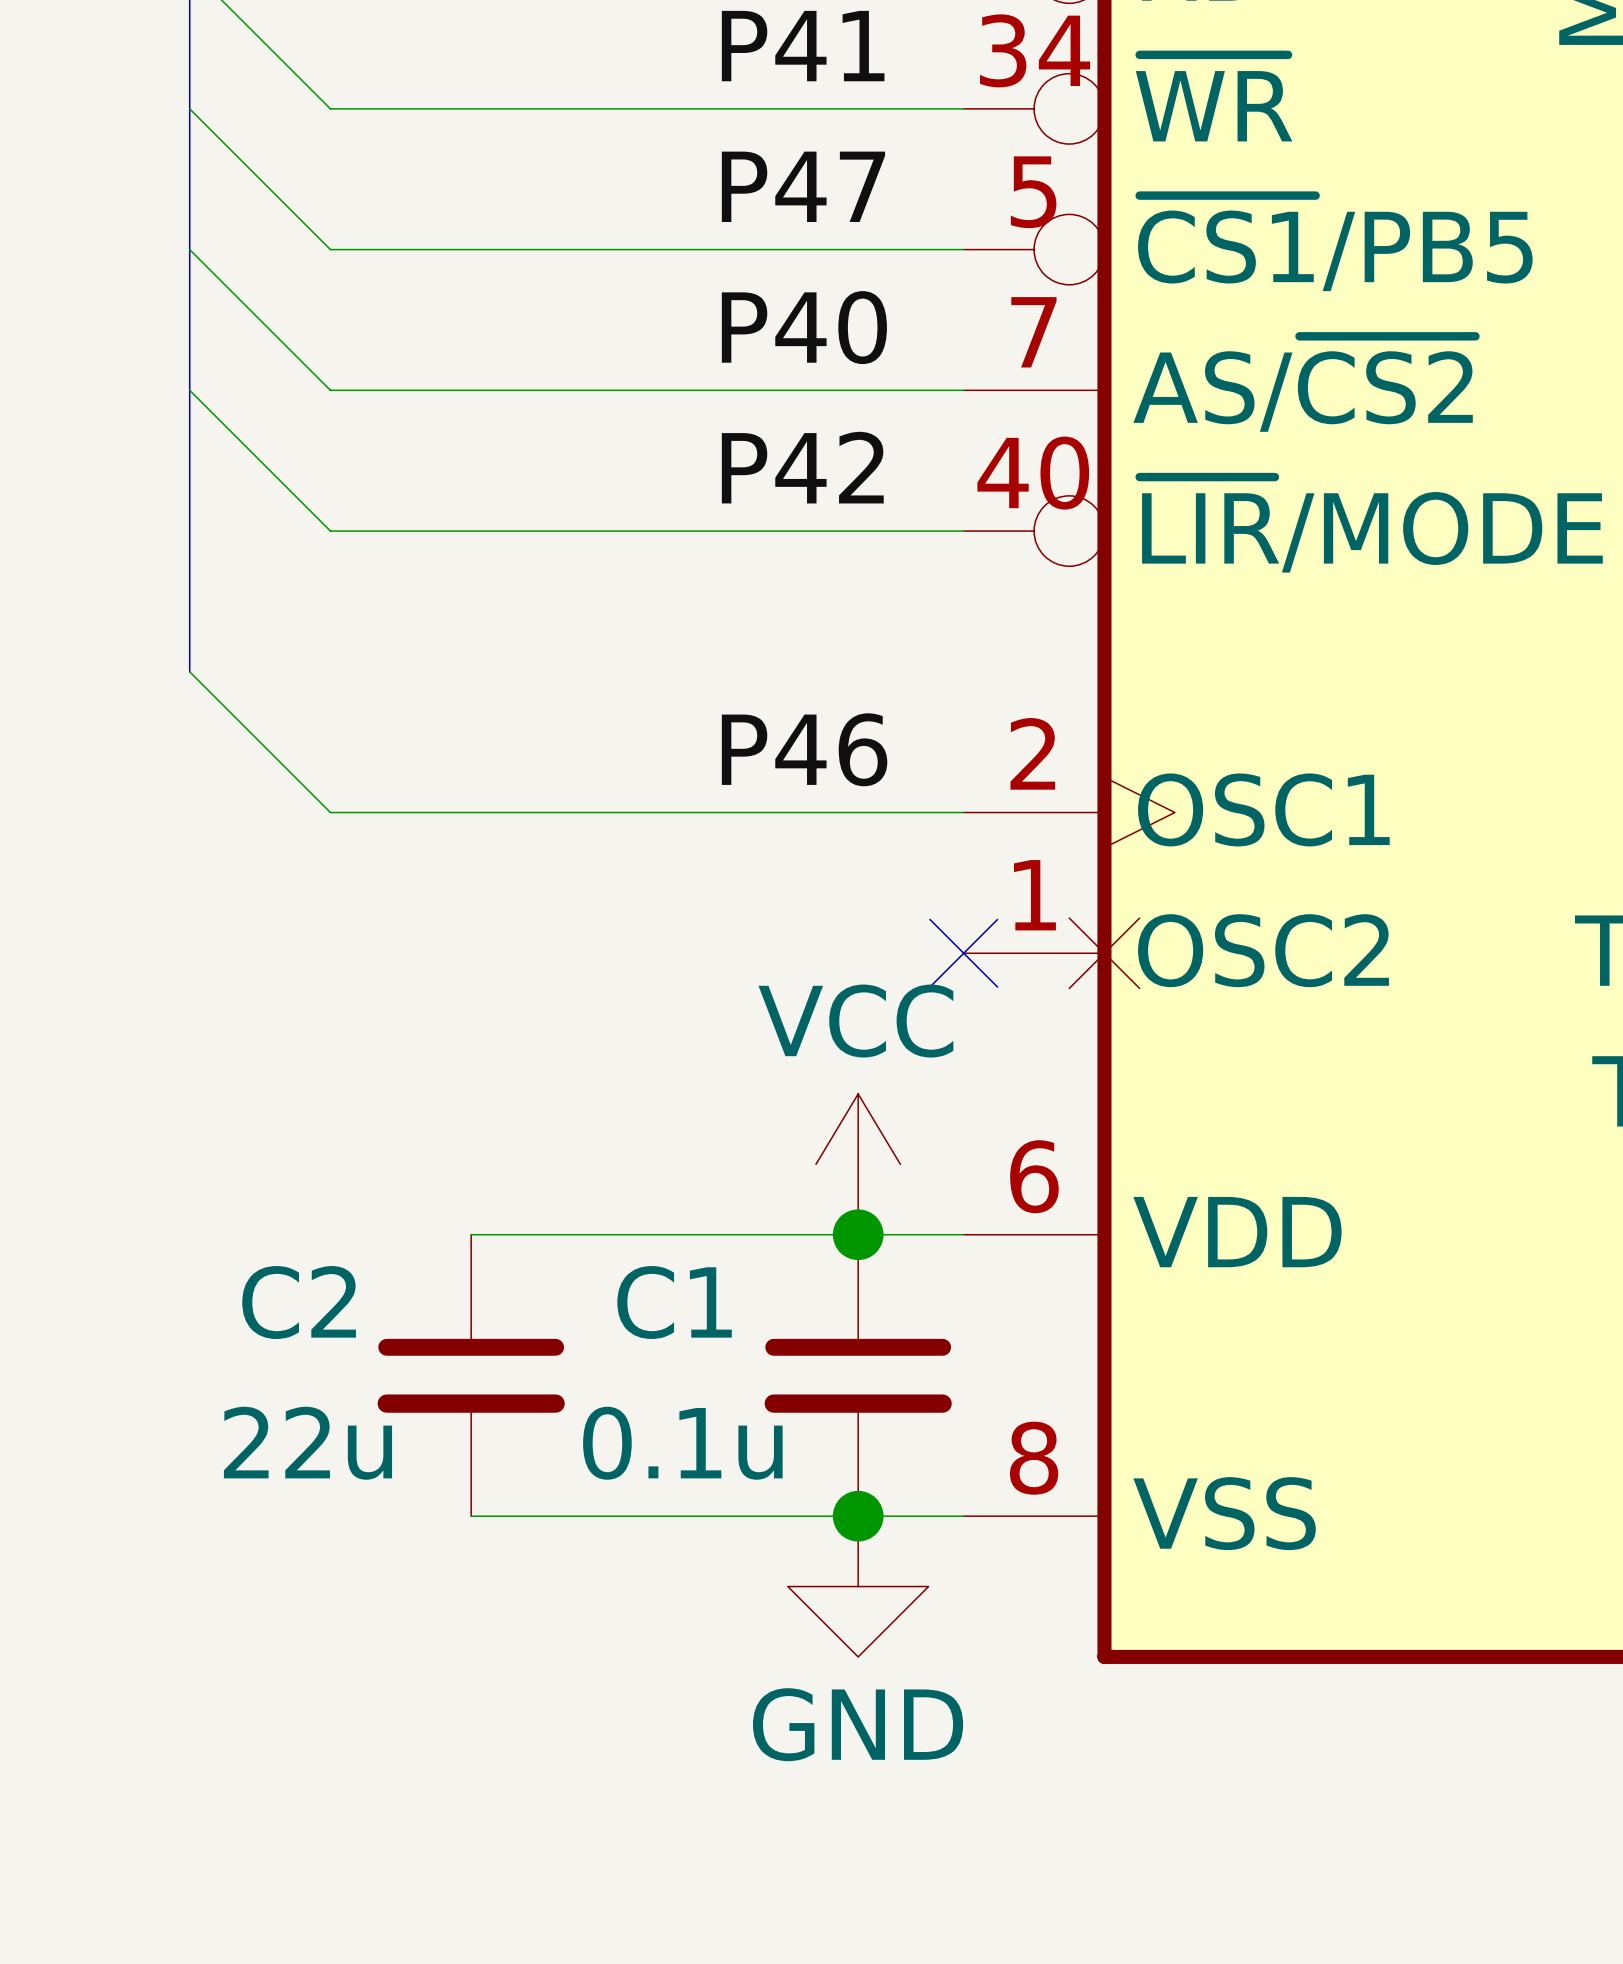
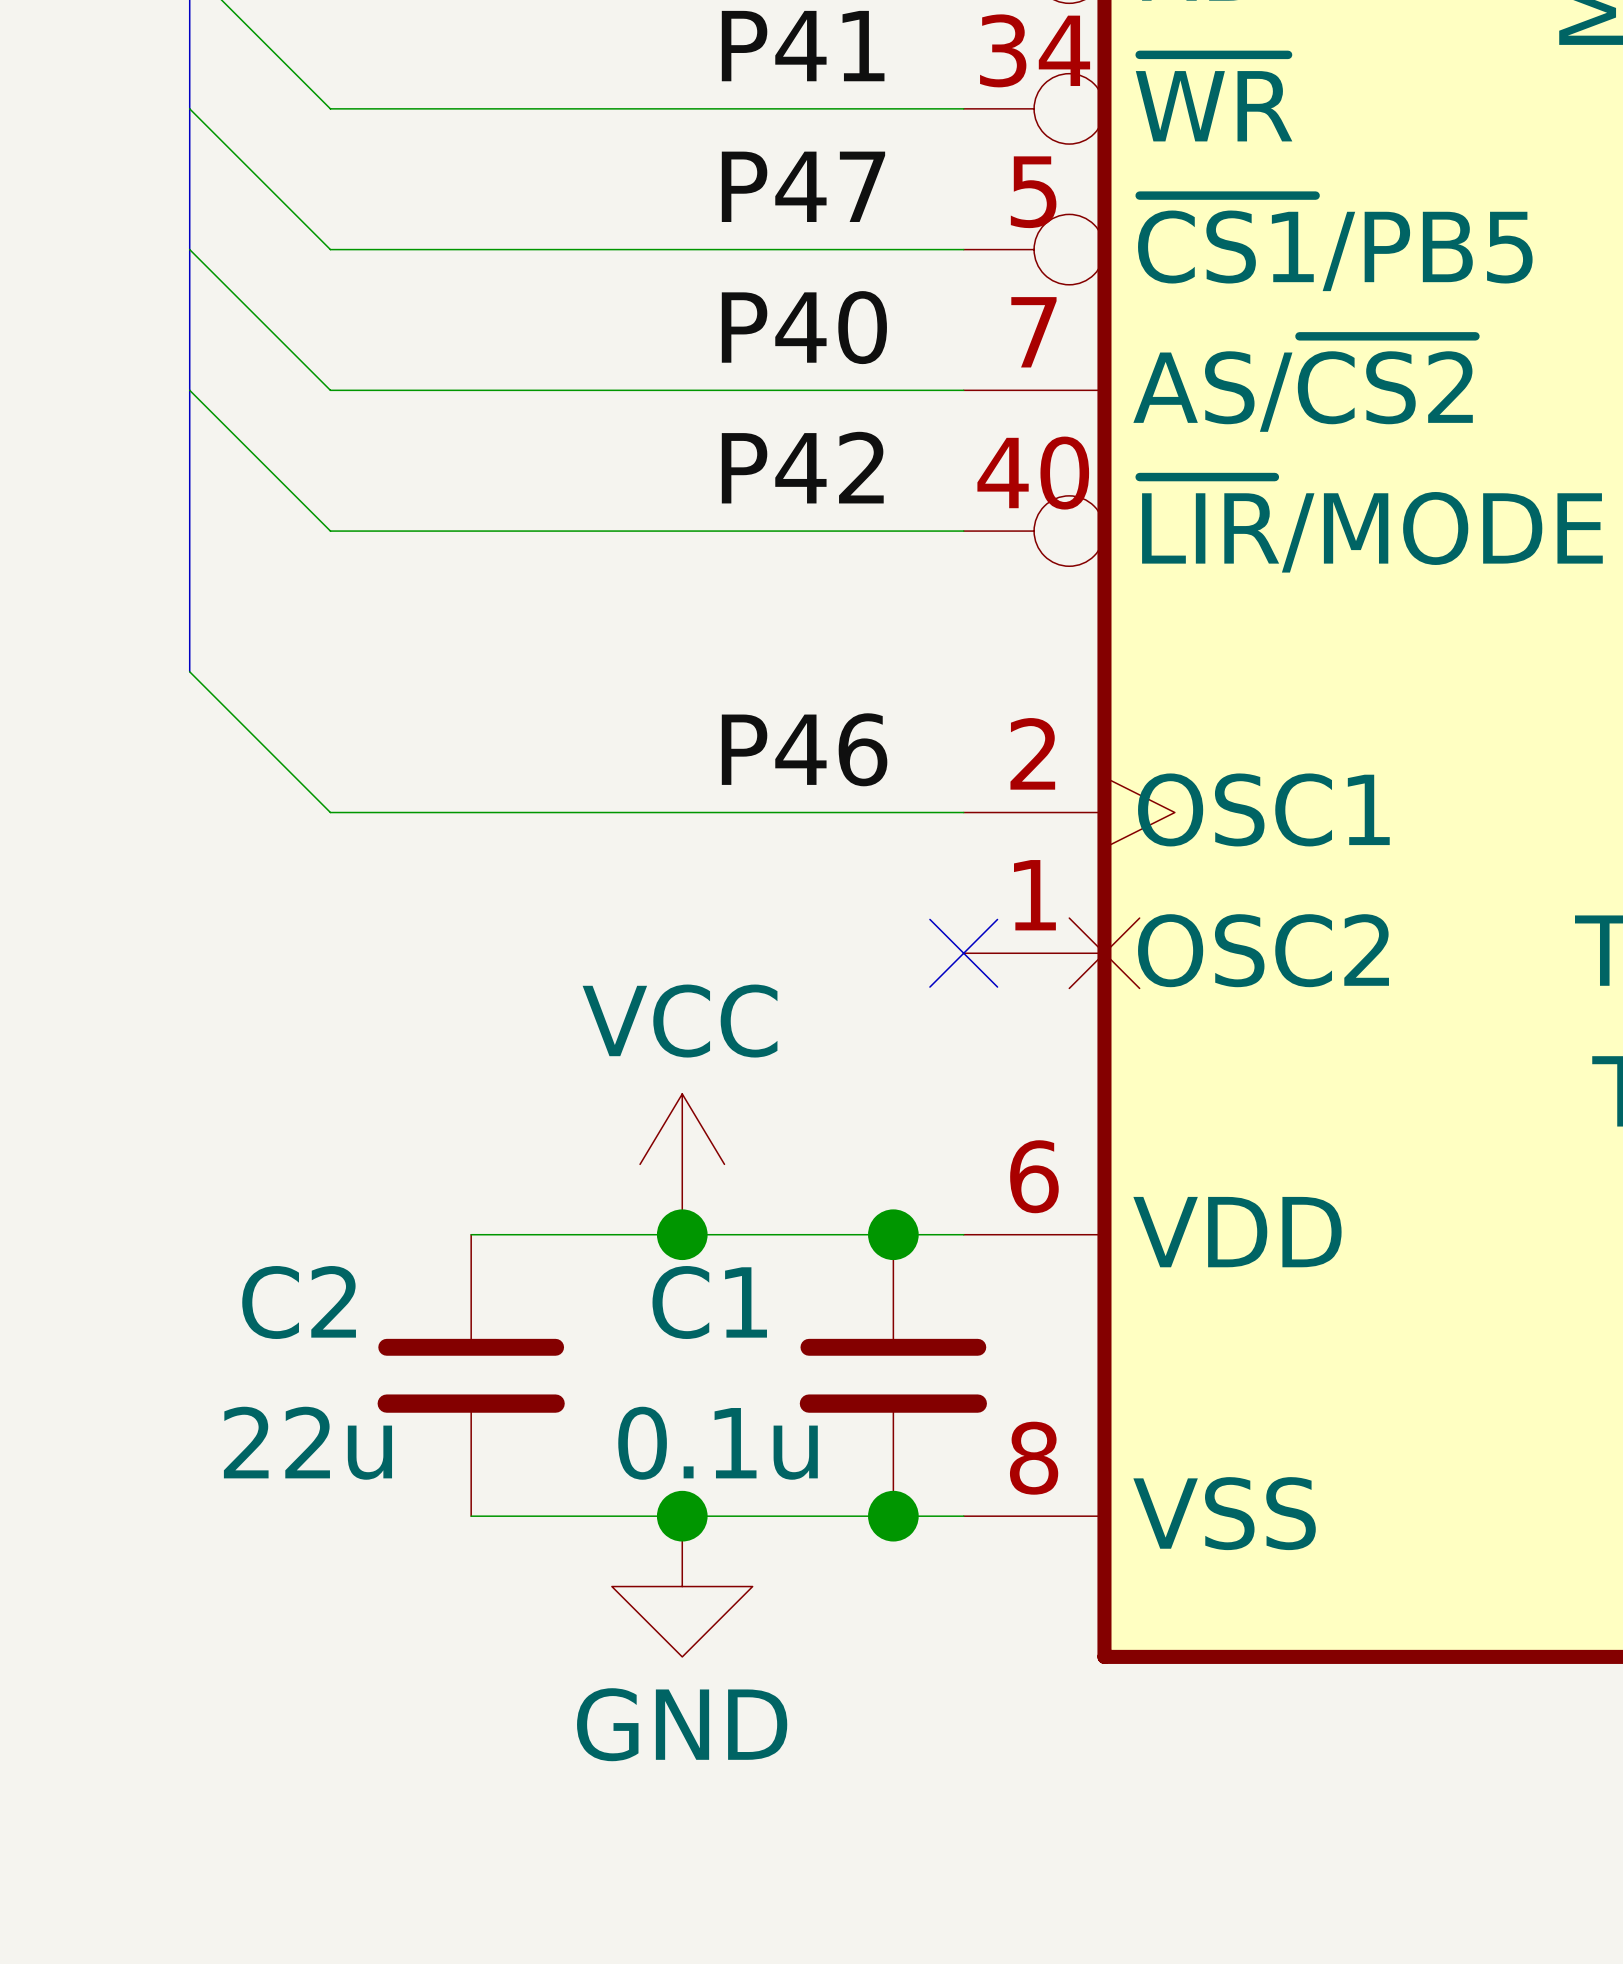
power symbol position: VCC (858, 1164) -> VCC (682, 1164)
junction: none -> (682, 1234)
junction position: (858, 1234) -> (893, 1234)
C1 position: (858, 1375) -> (893, 1375)
junction: none -> (682, 1516)
junction position: (858, 1516) -> (893, 1516)
power symbol position: GND (858, 1586) -> GND (682, 1586)

